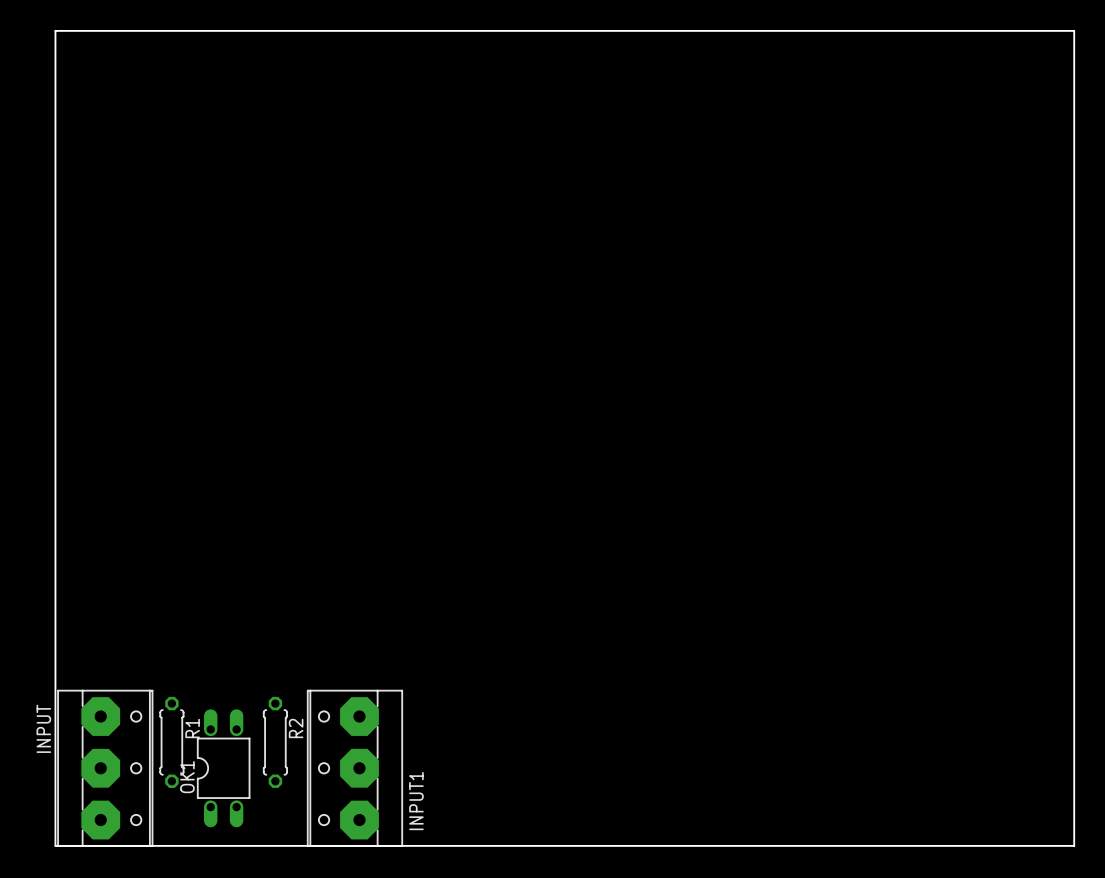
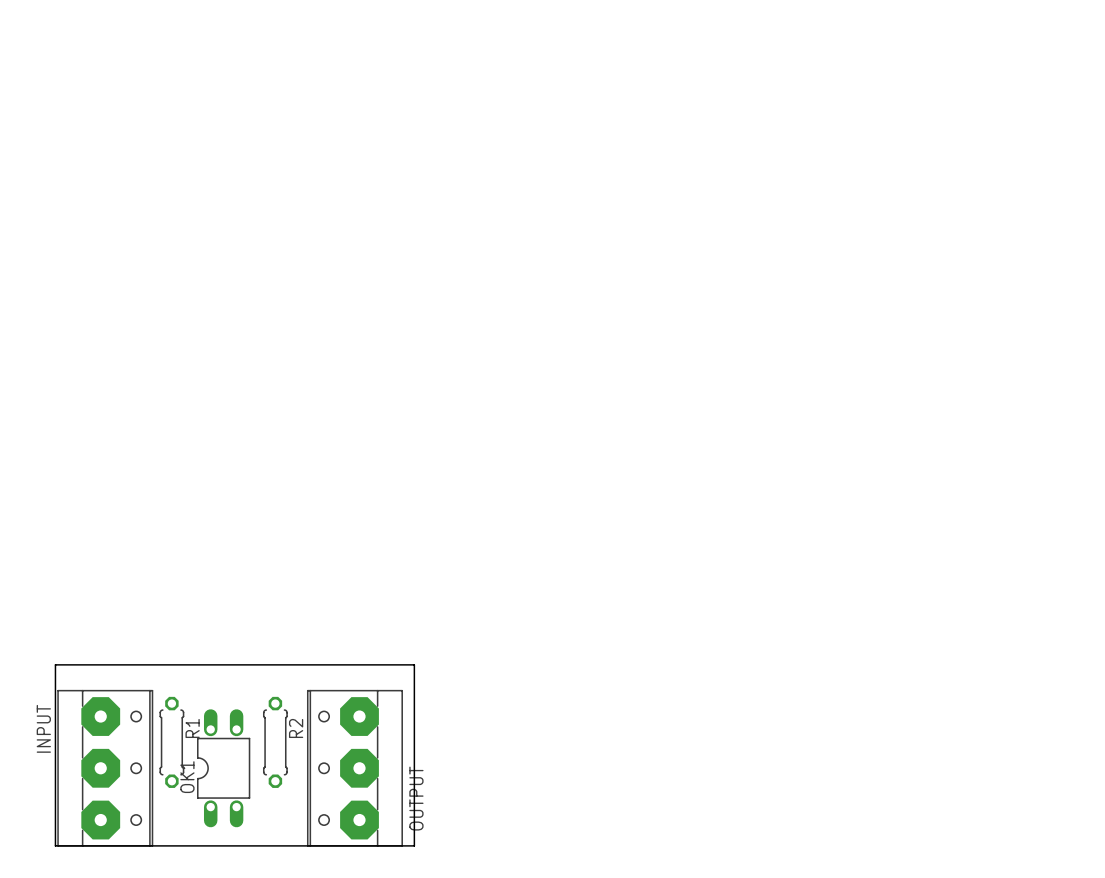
board edge: (55, 664) (55, 30) (1074, 30) (1074, 845) (414, 845) -> (55, 664) (414, 664) (414, 845)
INPUT1 name: INPUT1 (416, 801) -> OUTPUT (416, 798)

